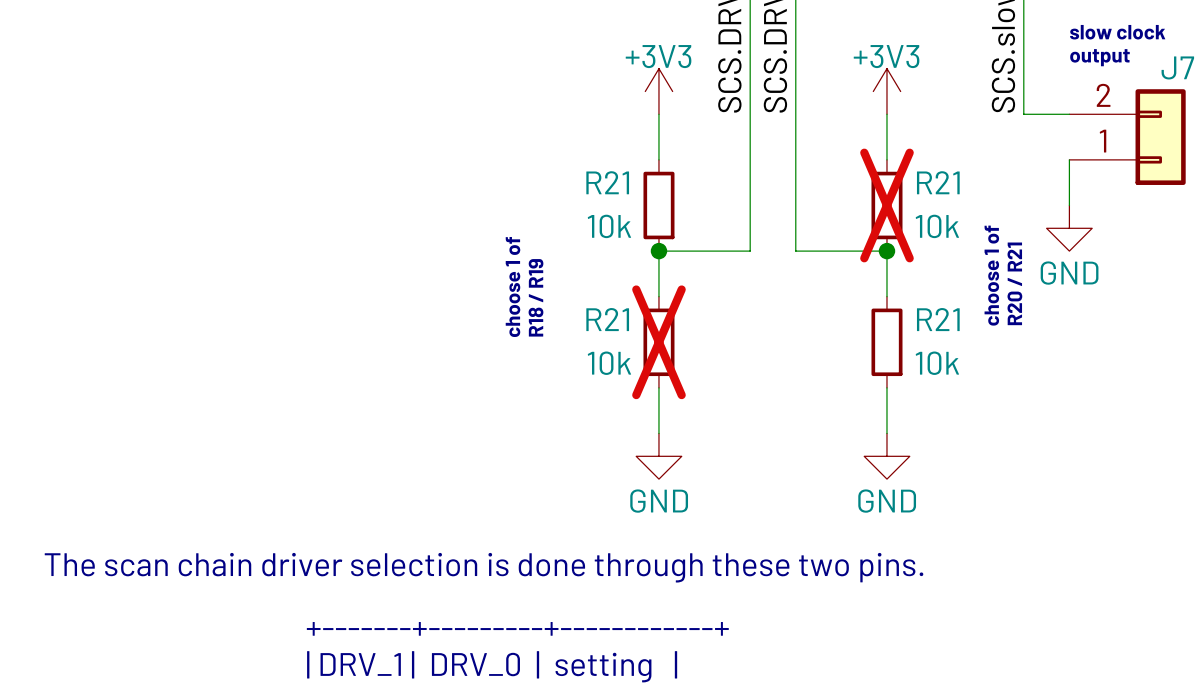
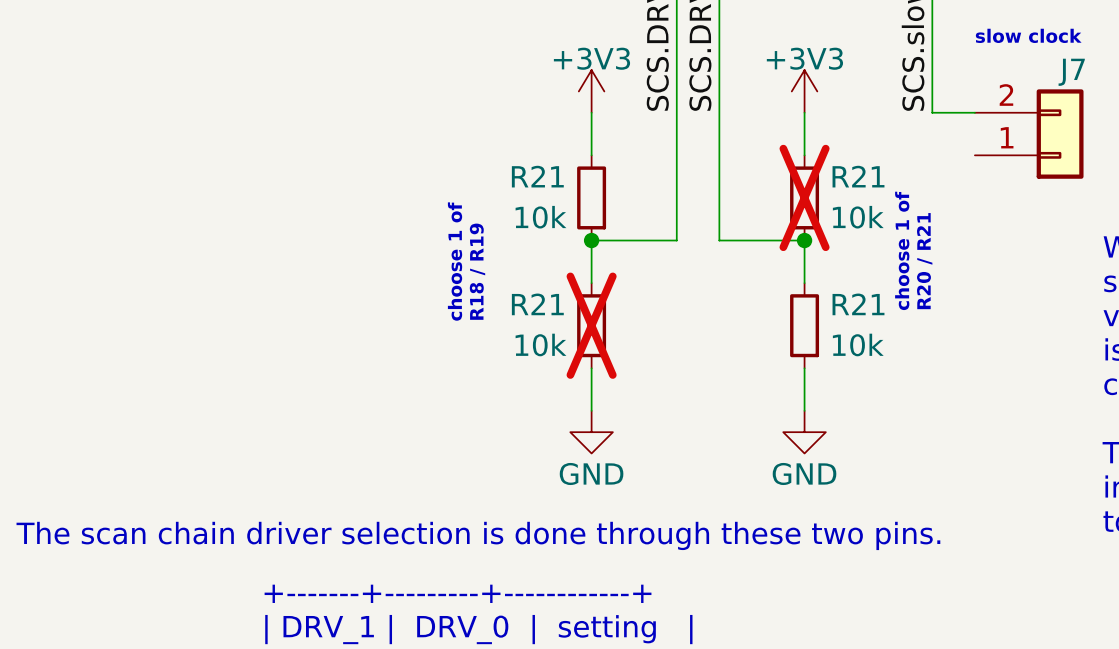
text: output (1099, 57) -> none
wire: (1069, 159) (1069, 205) -> none
power symbol: GND (1069, 228) -> none

